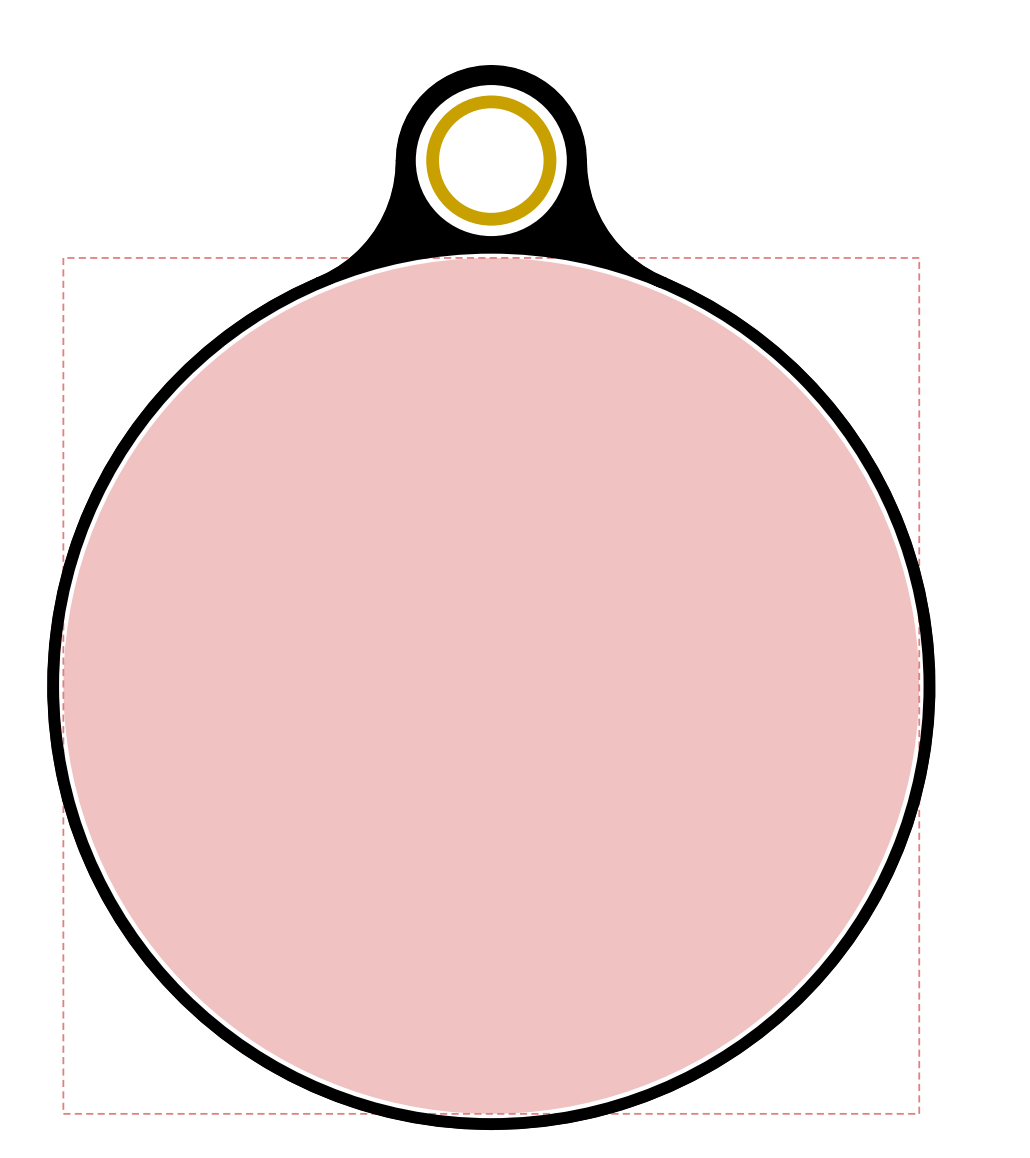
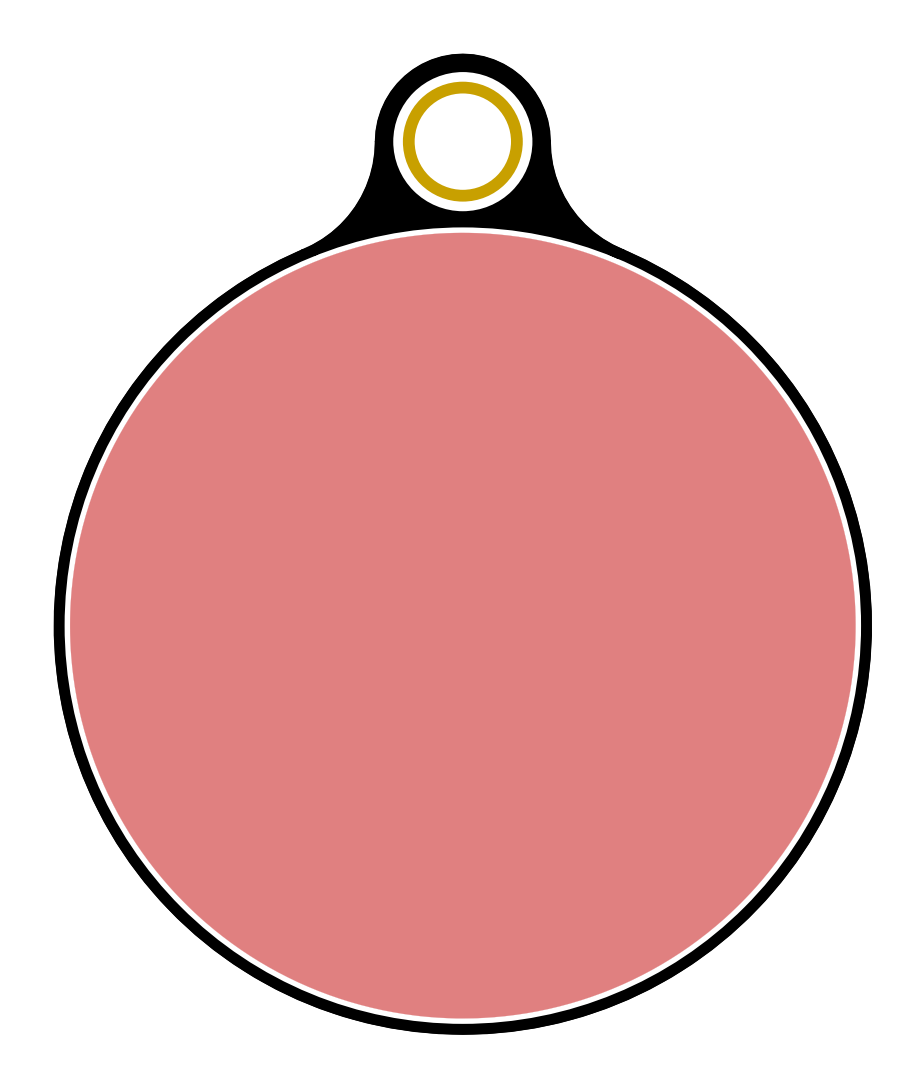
zone outline: (63, 257) (63, 1113) (919, 1113) (919, 257) (63, 257) -> none
drawing: none -> [69, 232, 856, 1019]

